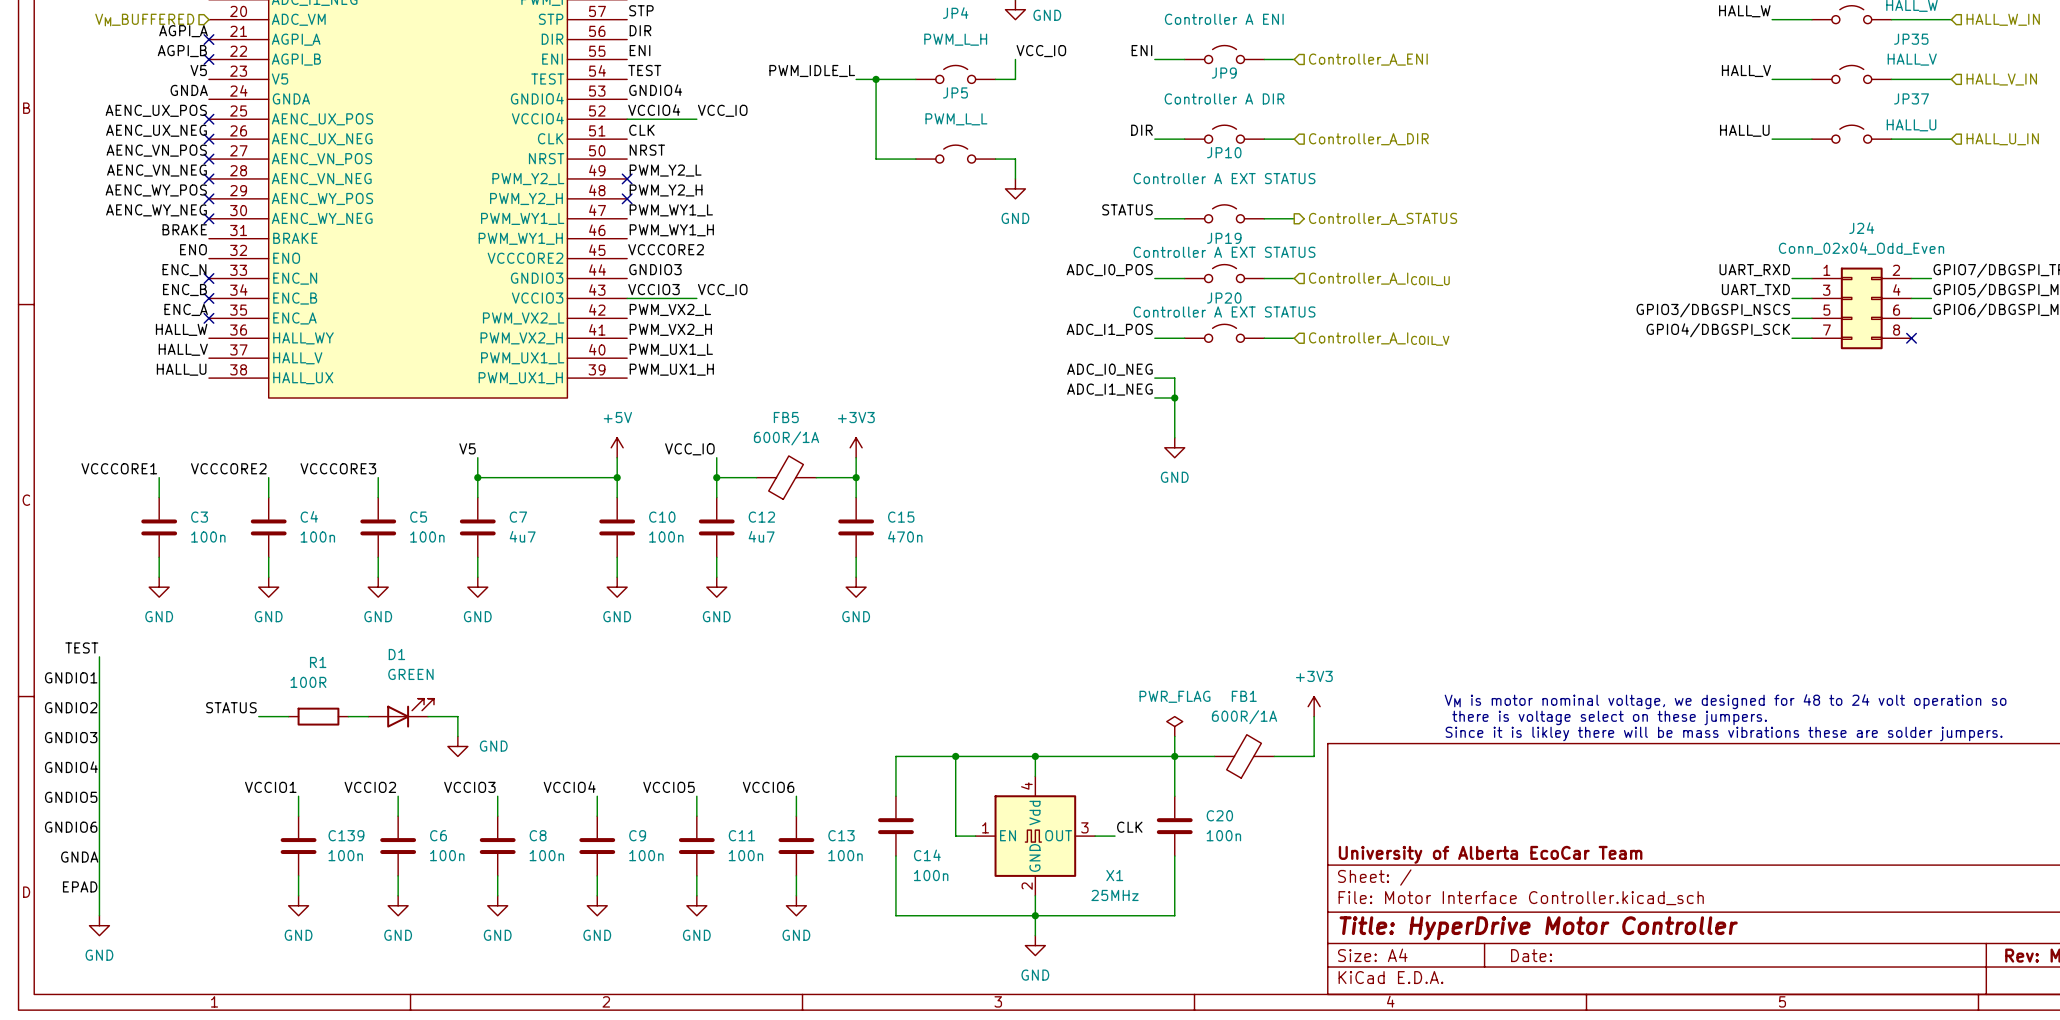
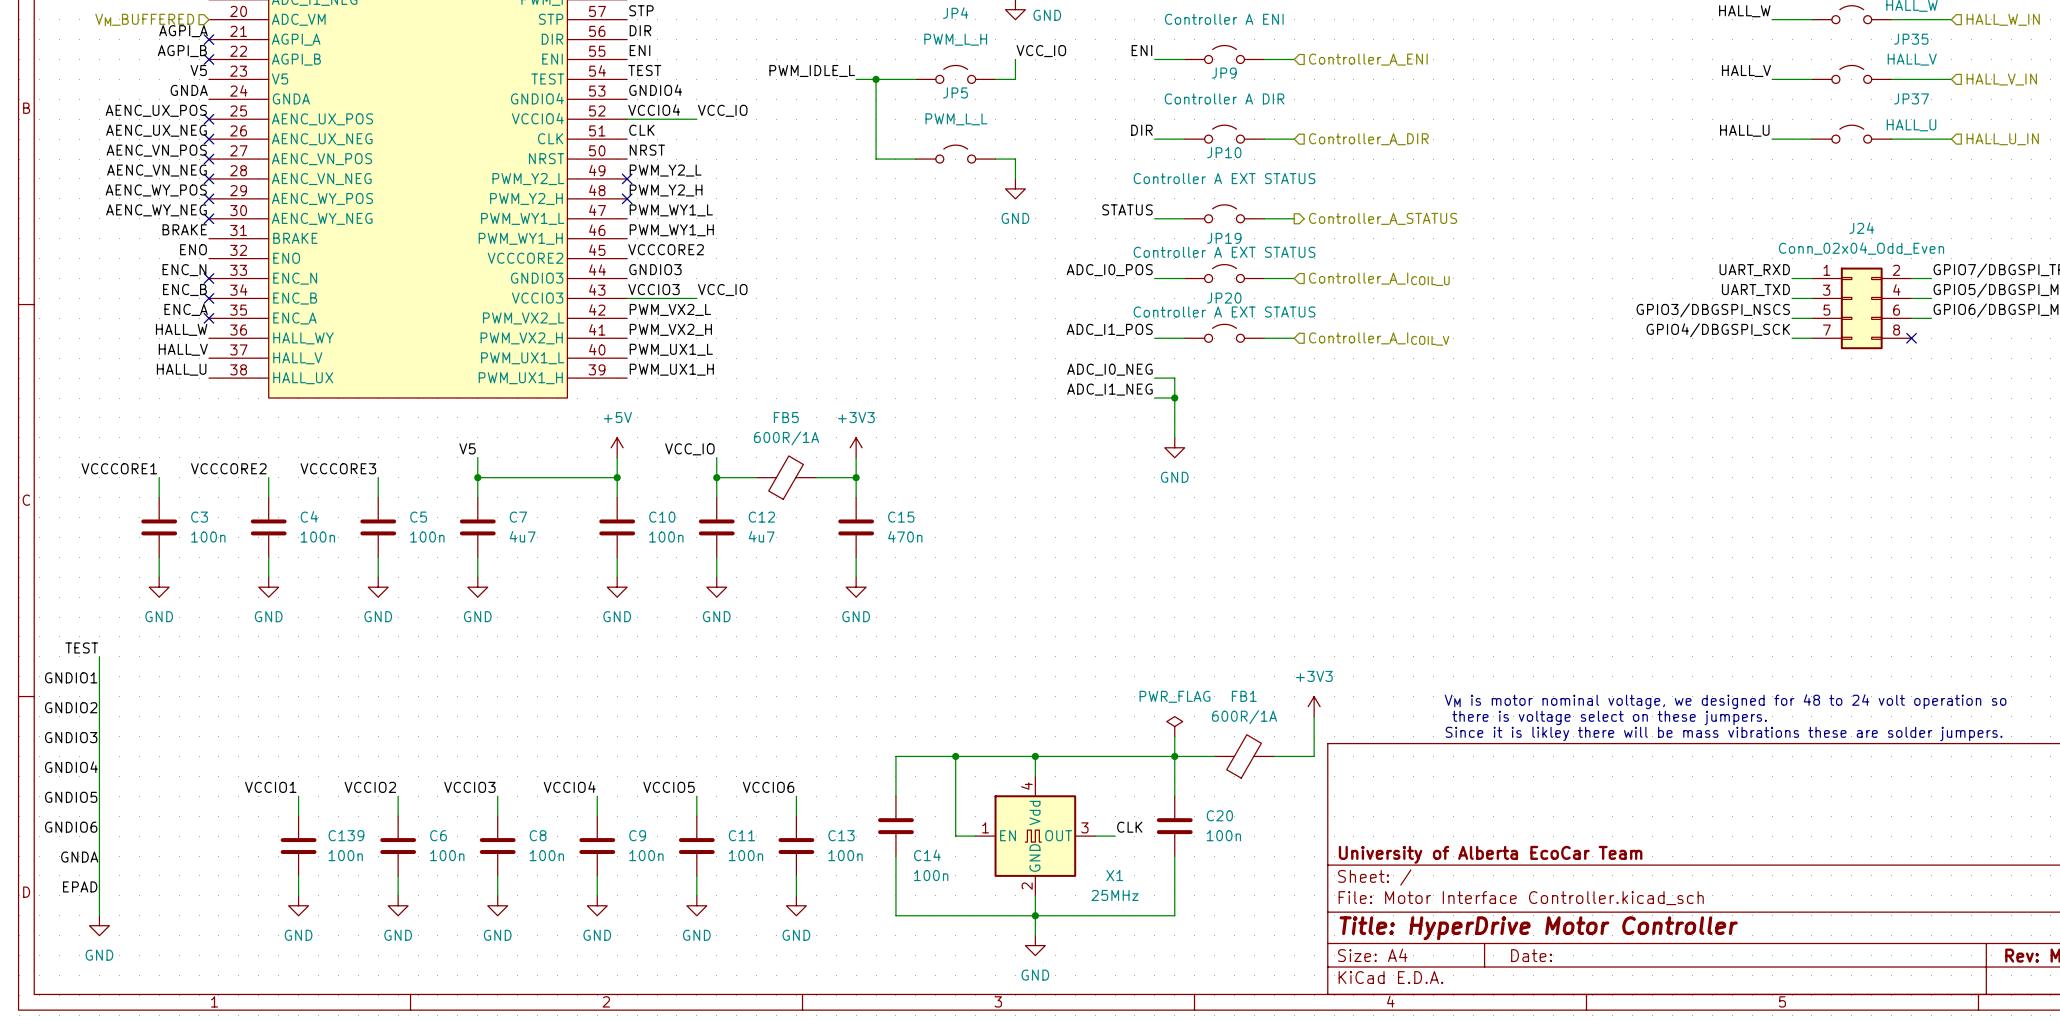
label: STATUS (231, 707) -> none
D1: GREEN (401, 713) -> none
wire: (258, 716) (288, 716) -> none
R1: 100R (318, 716) -> none
wire: (348, 716) (368, 716) -> none
wire: (428, 716) (457, 716) (457, 736) -> none
power symbol: GND (457, 746) -> none

